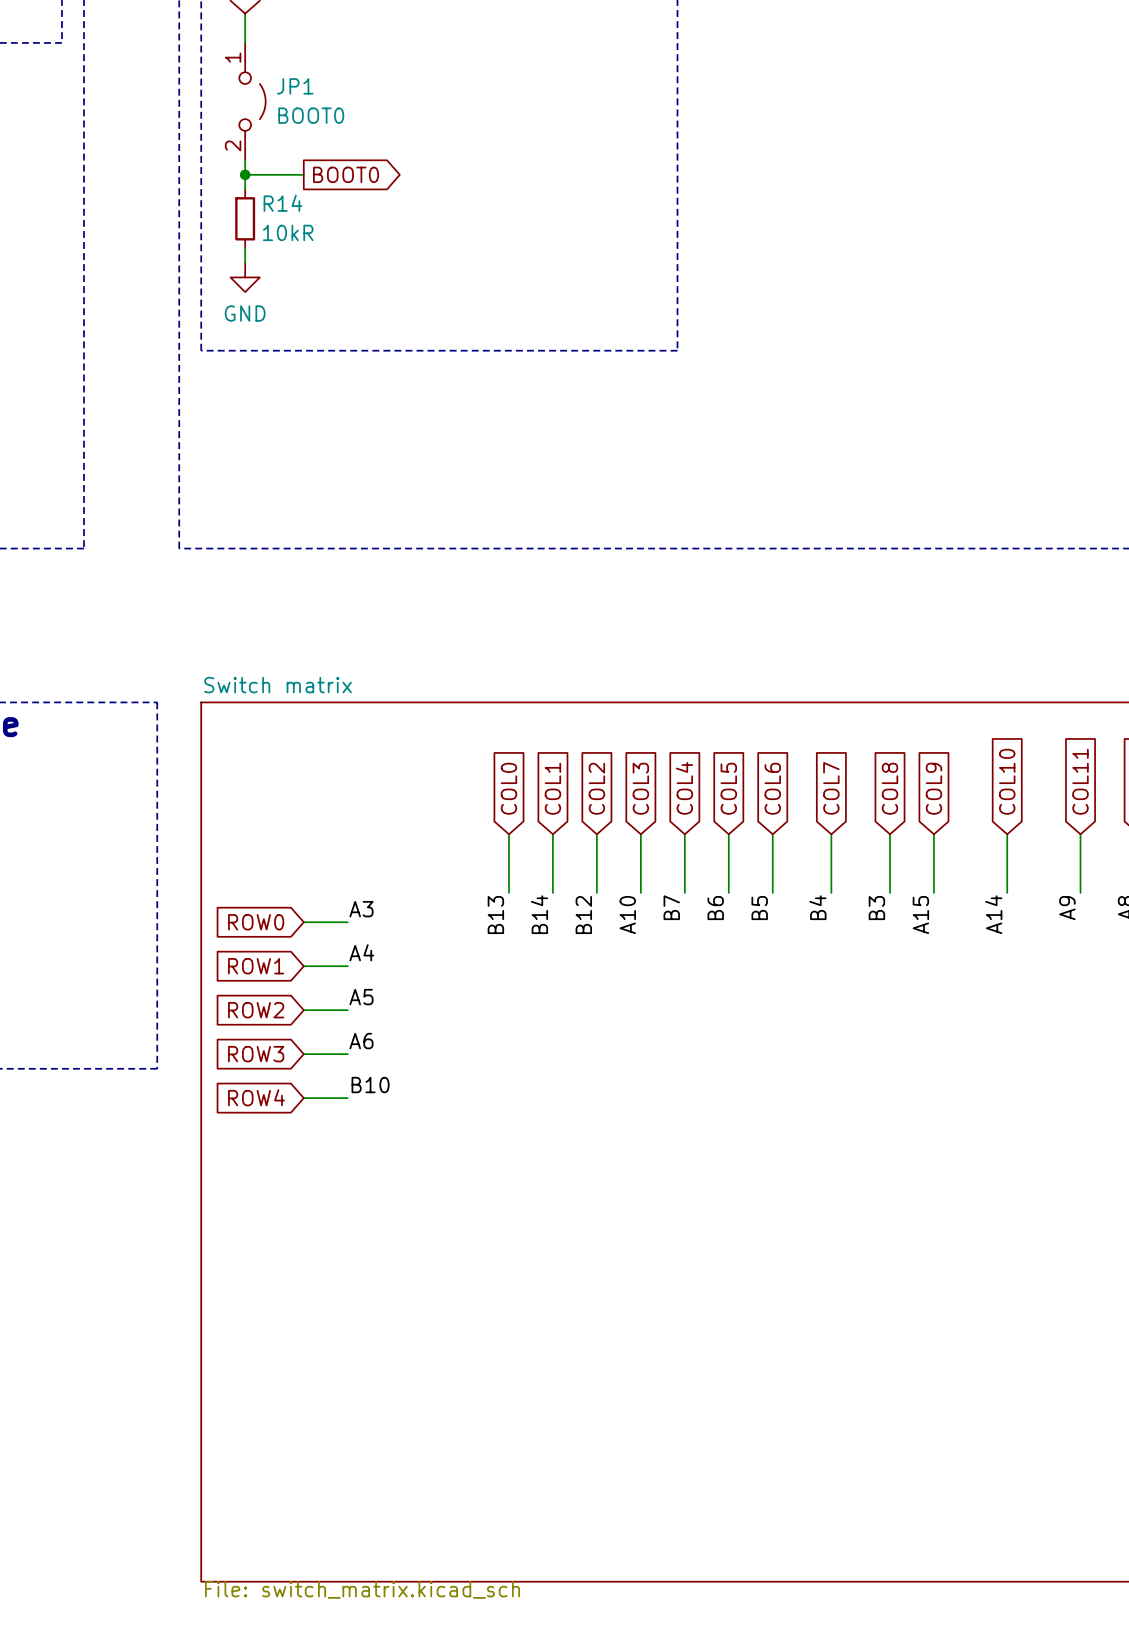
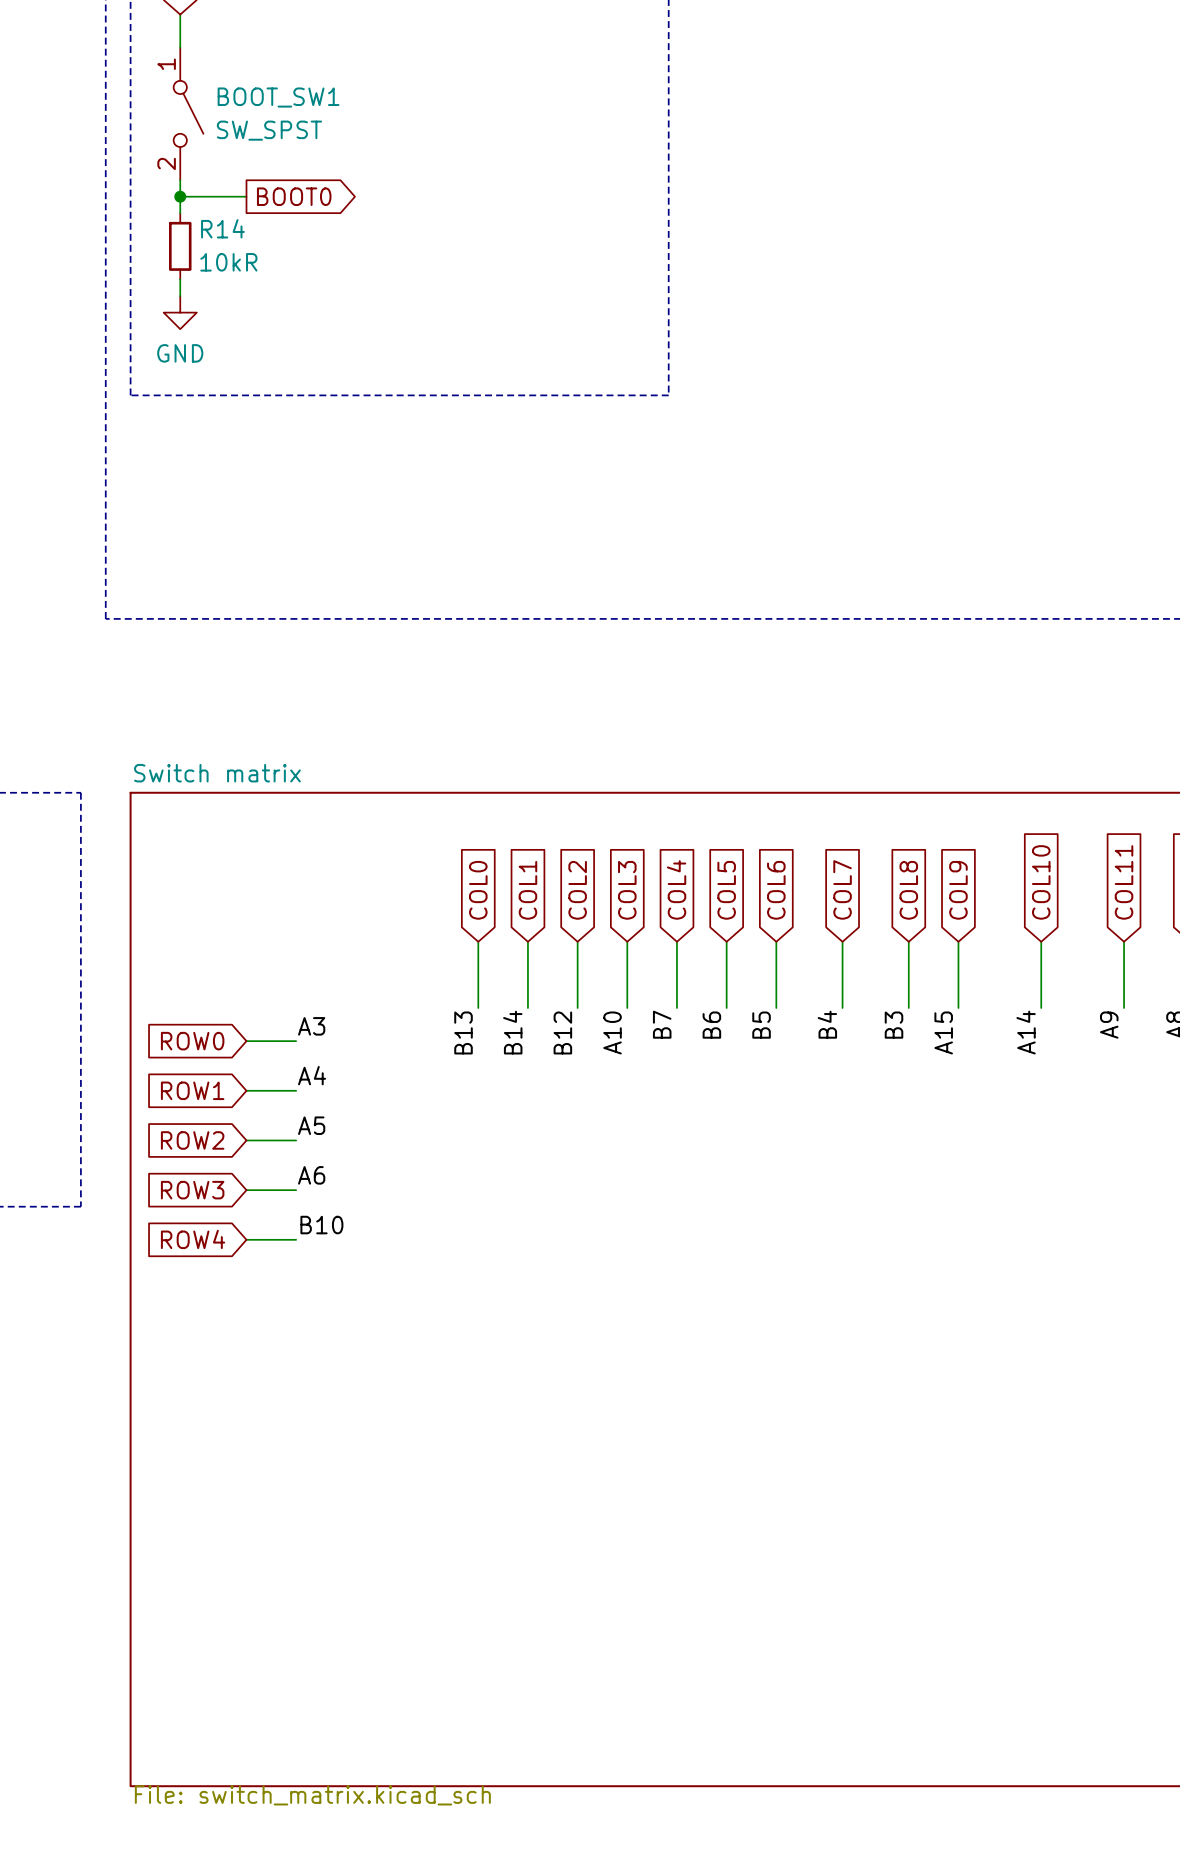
JP1: BOOT0 (252, 101) -> none
BOOT_SW1: none -> SW_SPST (188, 113)

